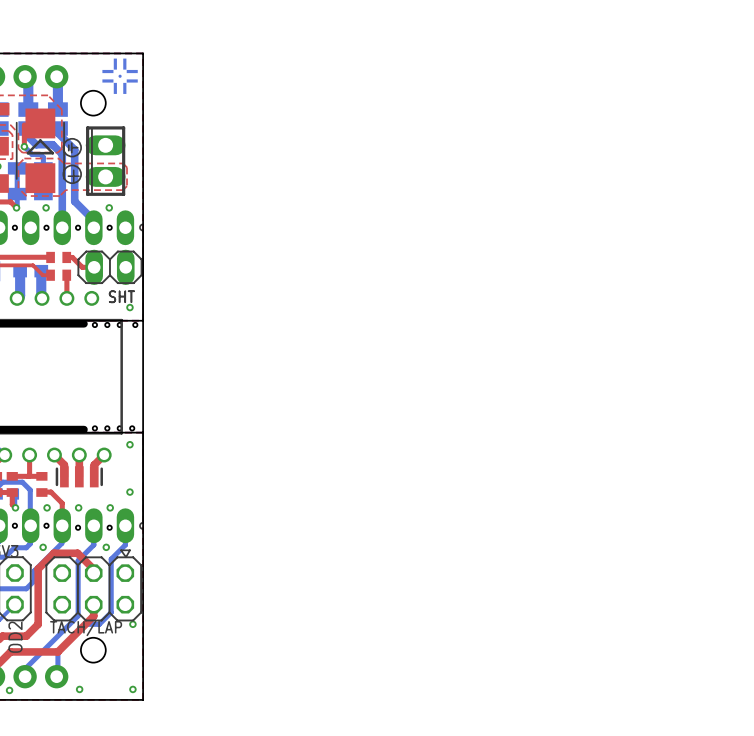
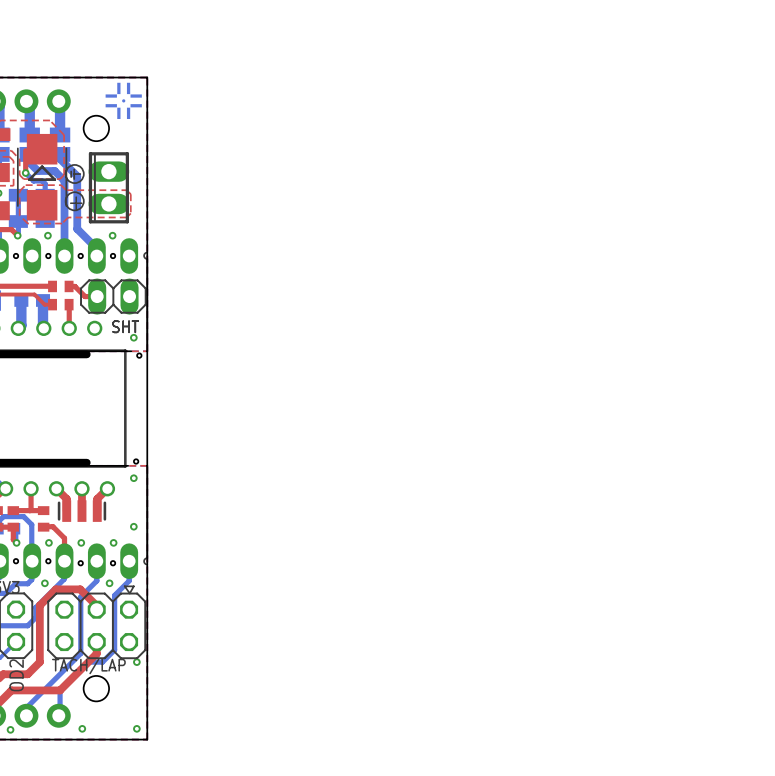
board edge: (127, 320) (143, 320) -> none
hole: (94, 324) -> none
hole: (107, 324) -> none
hole: (119, 324) -> none
hole: (94, 428) -> none
hole: (107, 428) -> none
hole: (119, 428) -> none
board edge: (124, 432) (143, 432) -> none

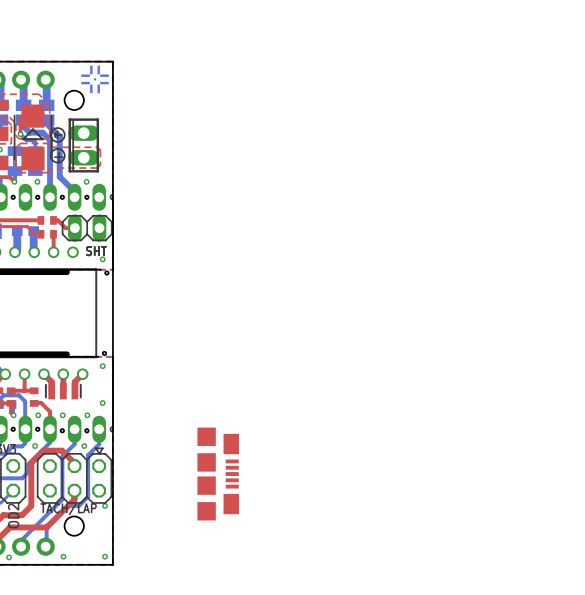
part: none -> (218, 474)

